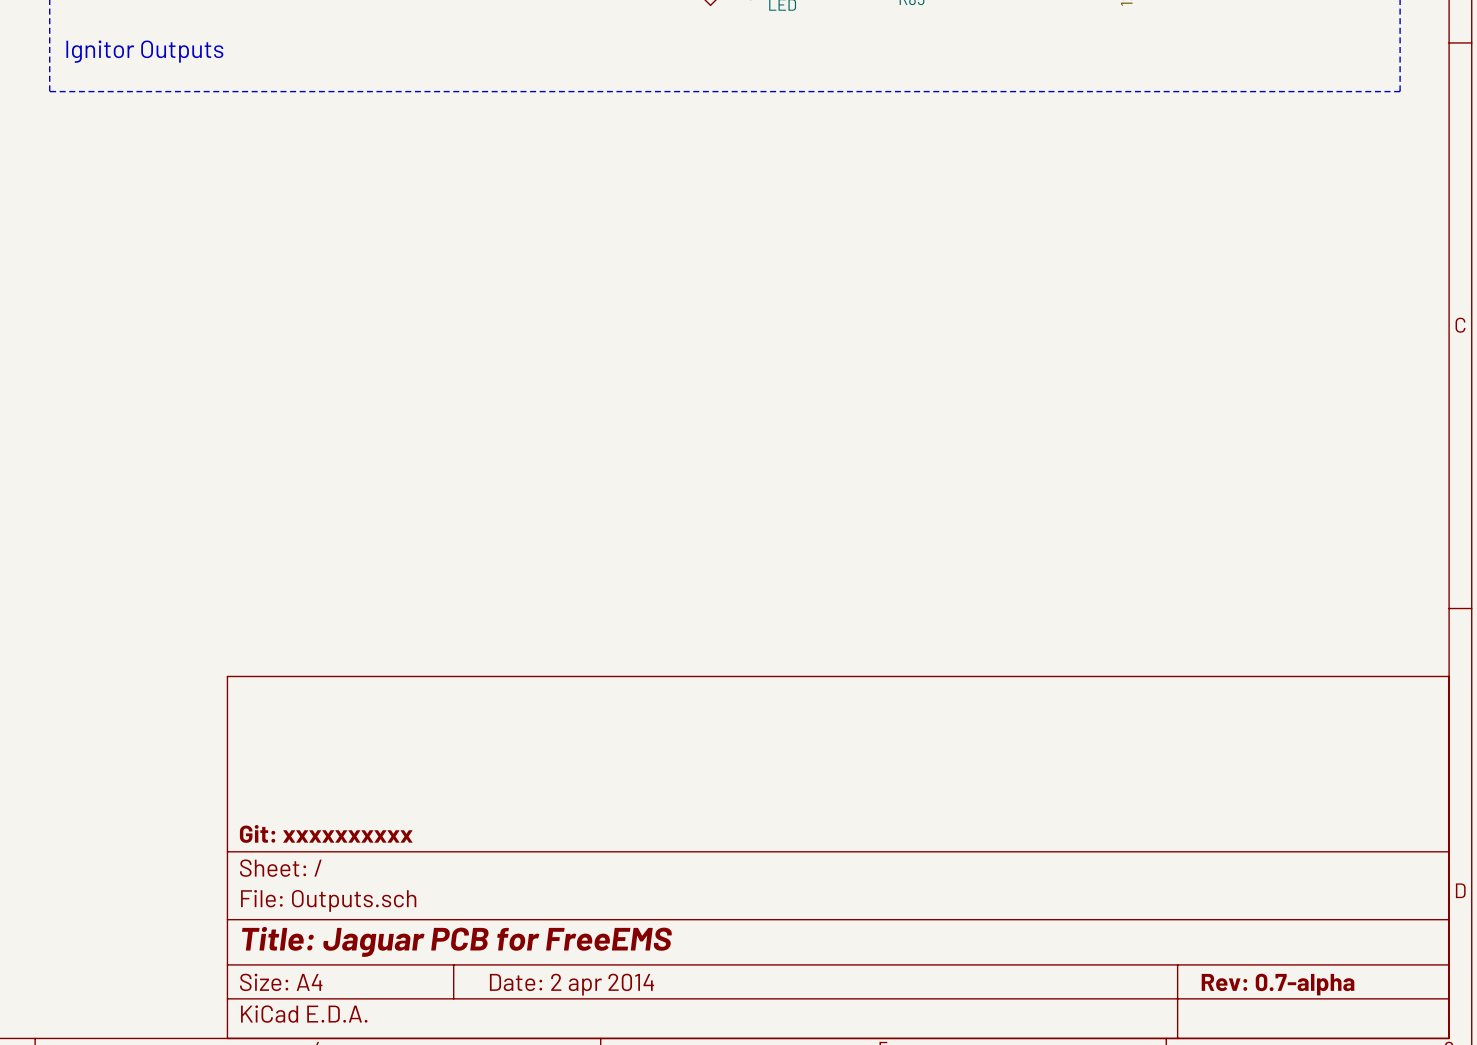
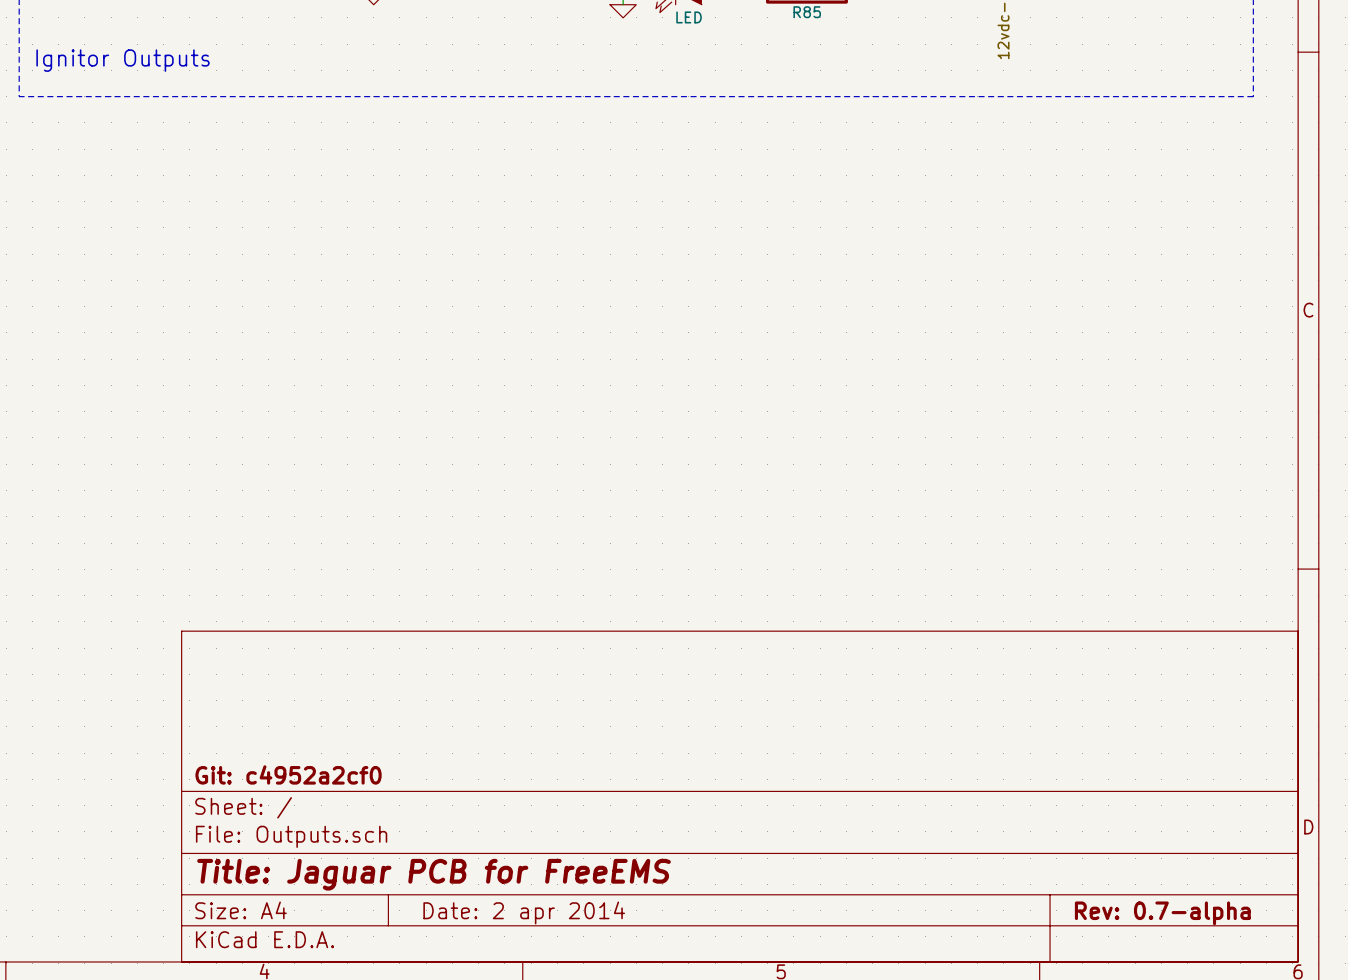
title block: Git: xxxxxxxxxx (326, 833) -> Git: c4952a2cf0 (288, 774)

